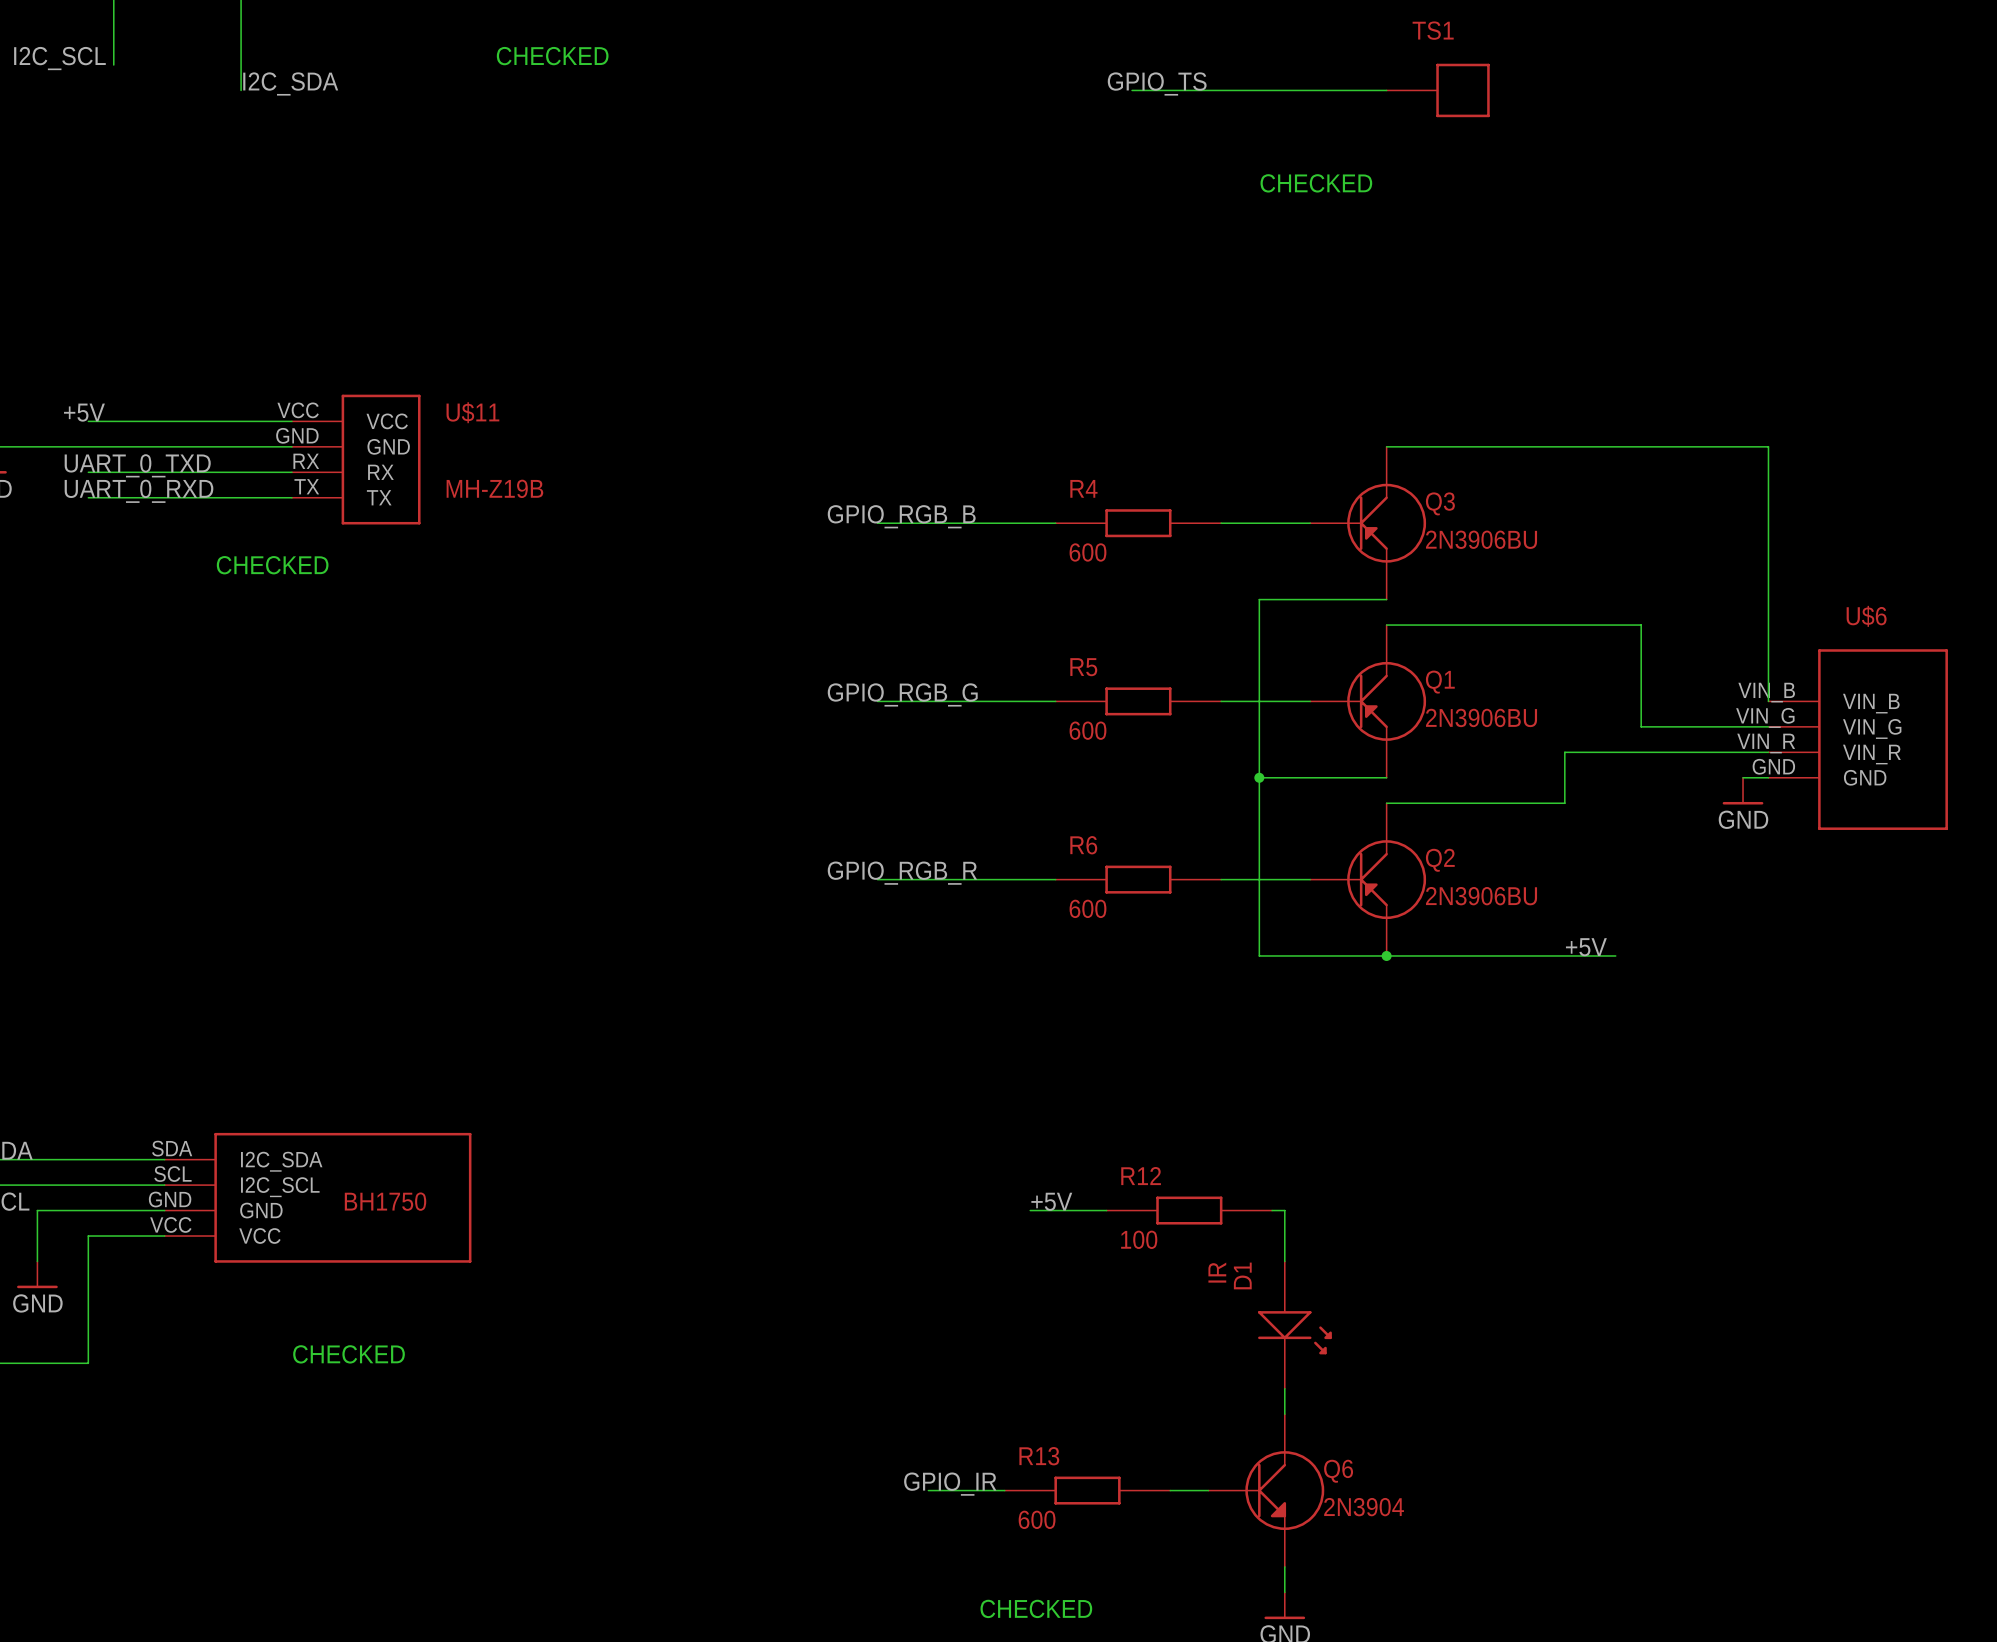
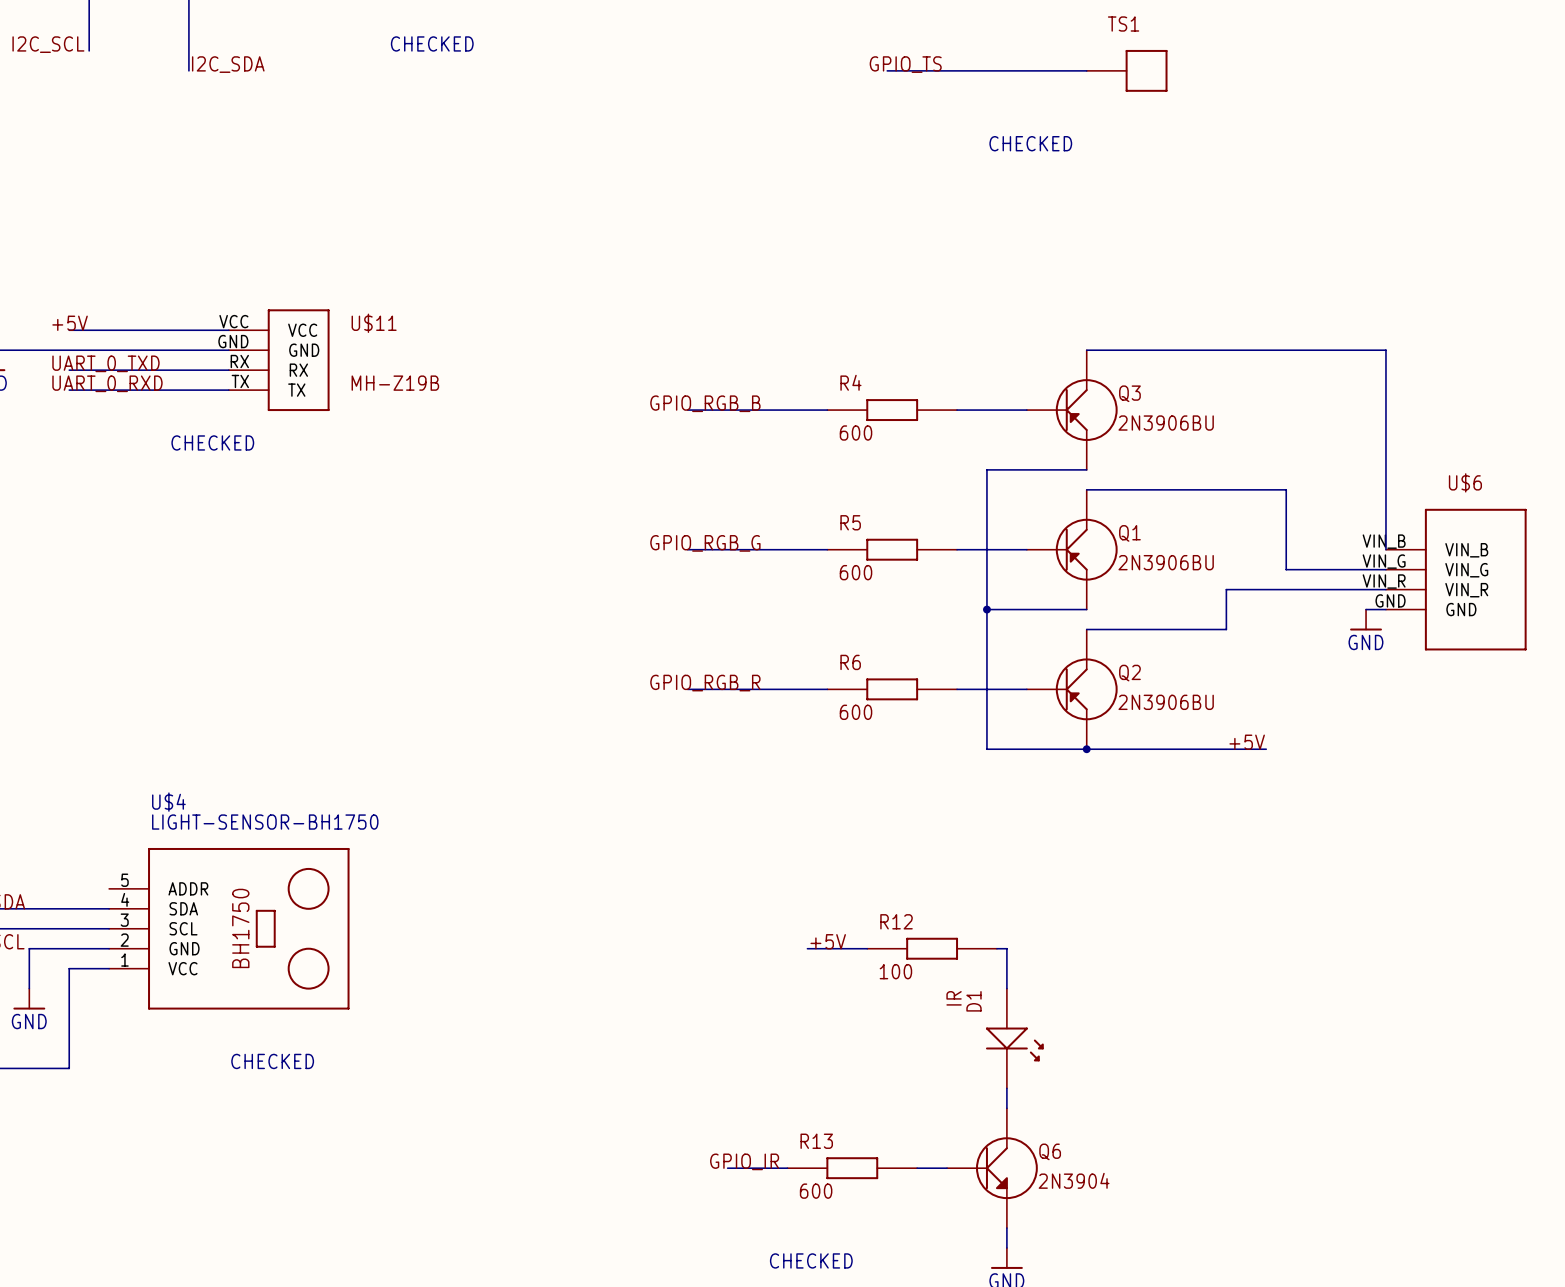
U$4: none -> LIGHT-SENSOR-BH1750 (229, 928)
part: (318, 1197) -> none

